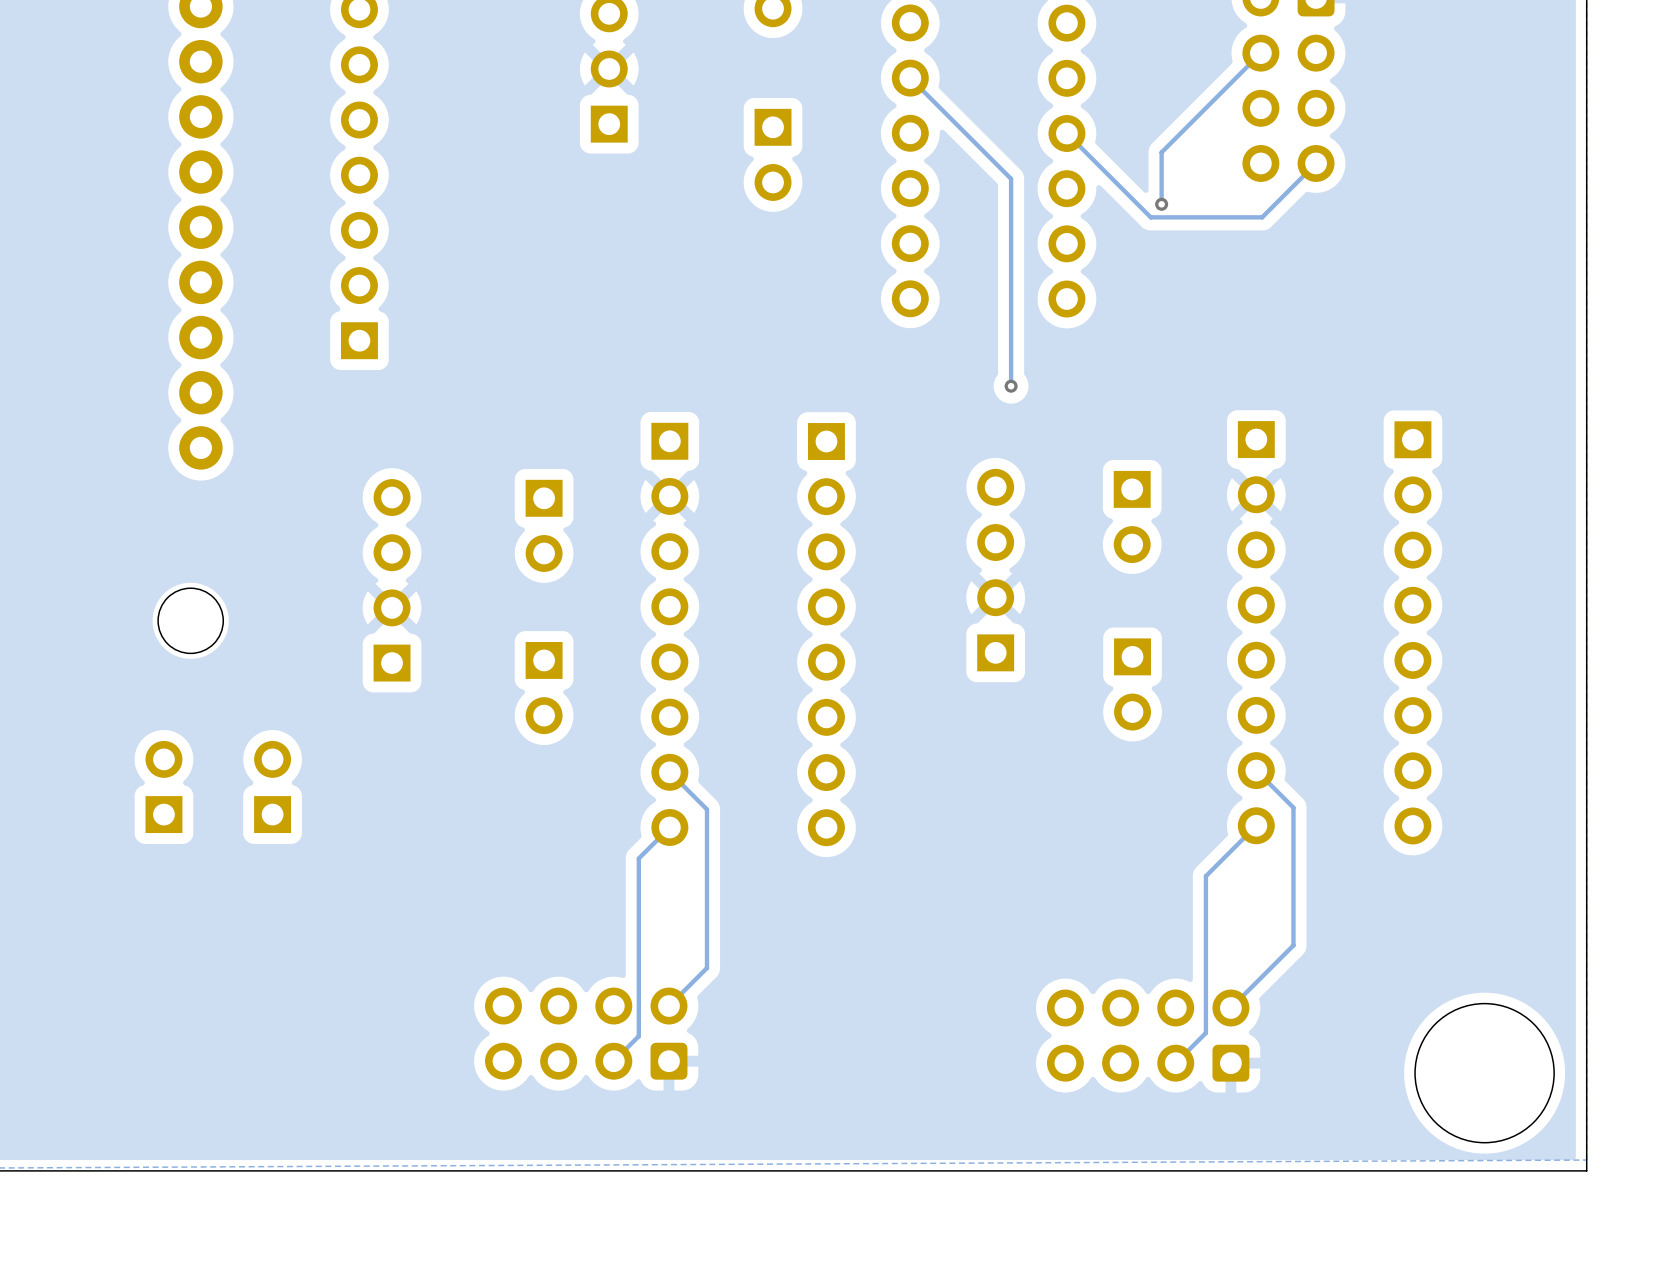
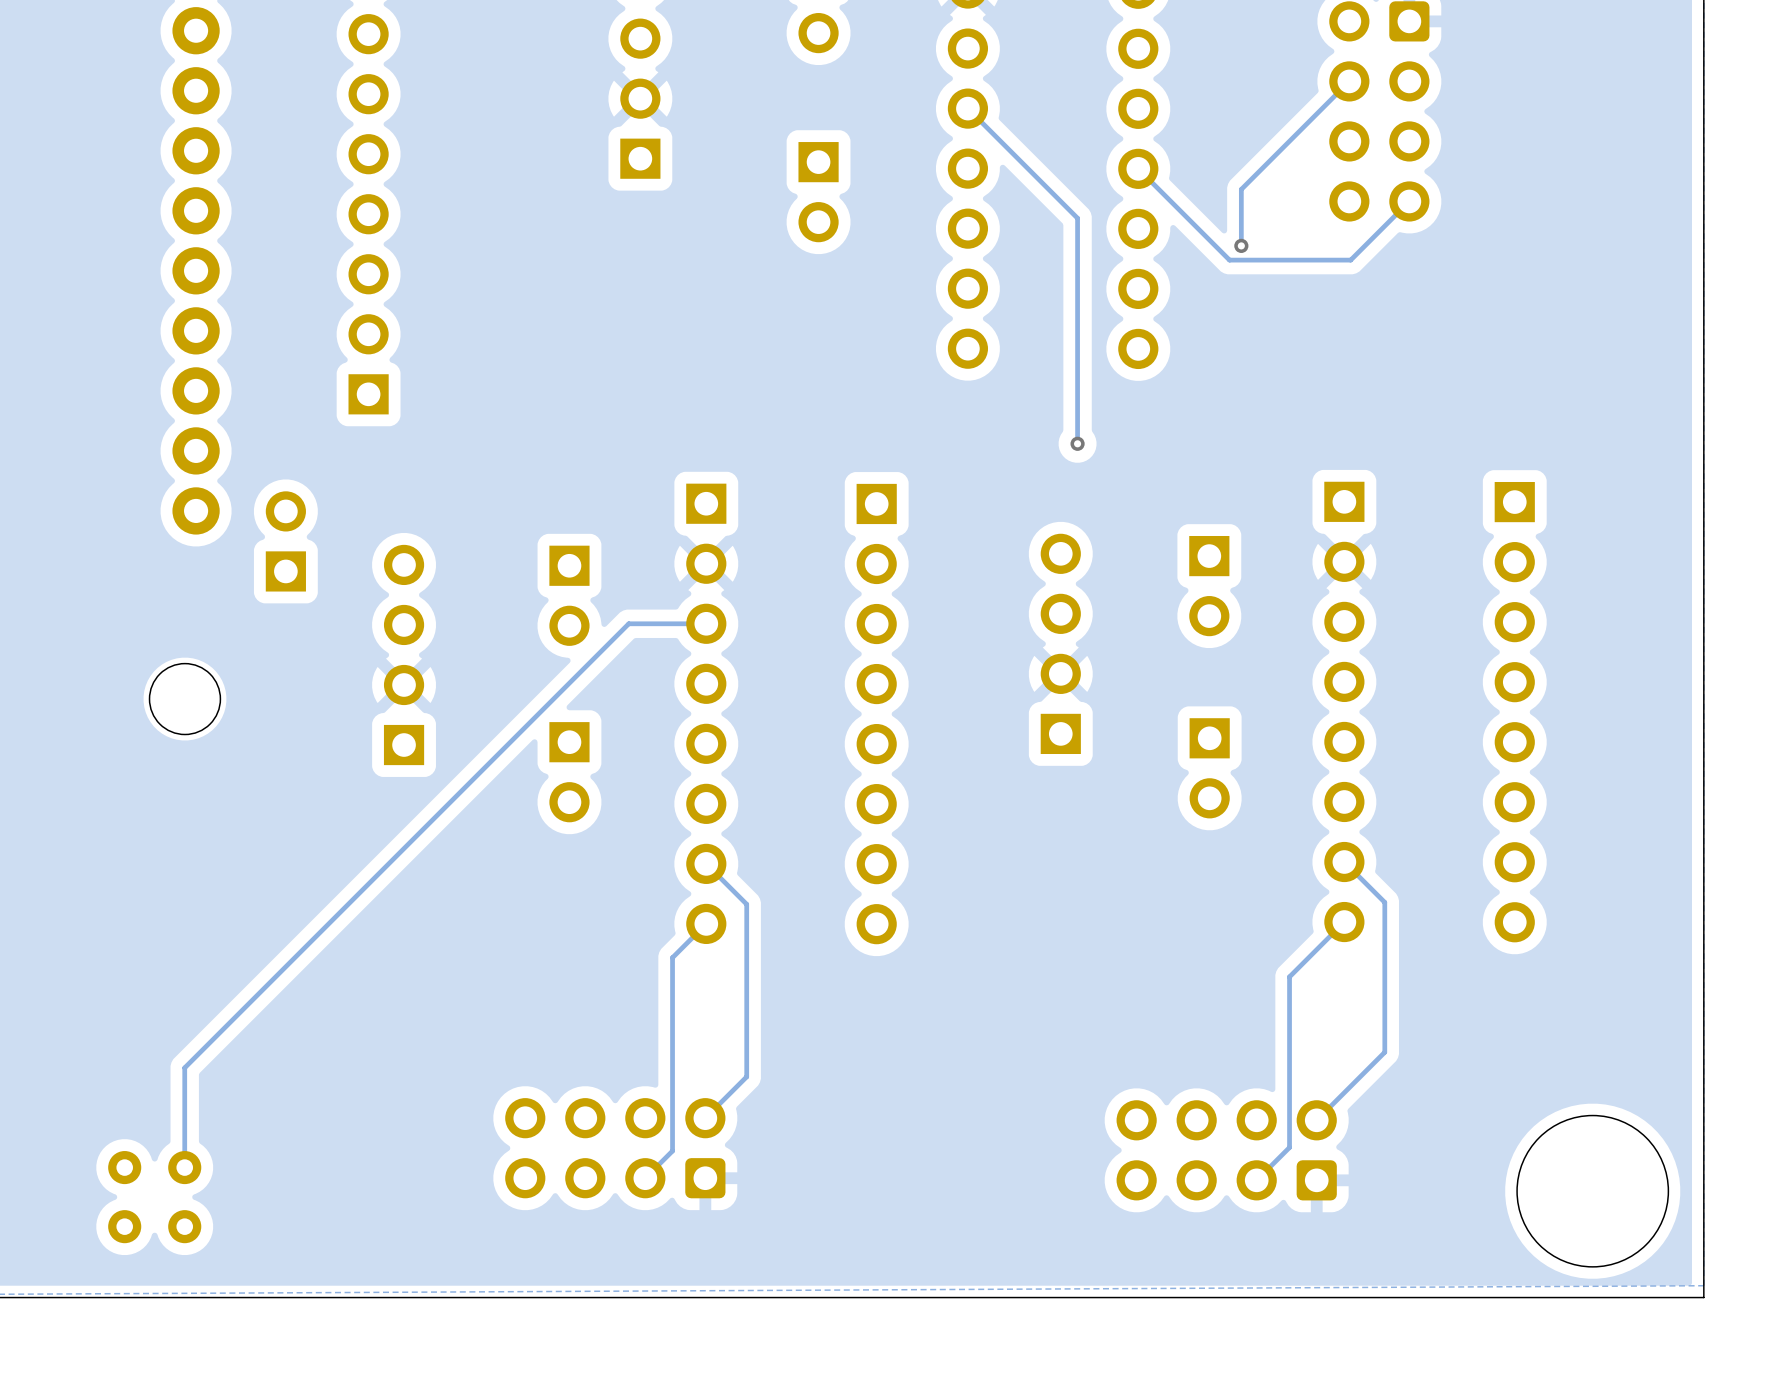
part: none -> (285, 541)
track: none -> (706, 623) (628, 623) (184, 1067) (184, 1167)
part: (163, 786) -> none
part: (272, 786) -> none
part: none -> (154, 1167)
part: none -> (154, 1226)

